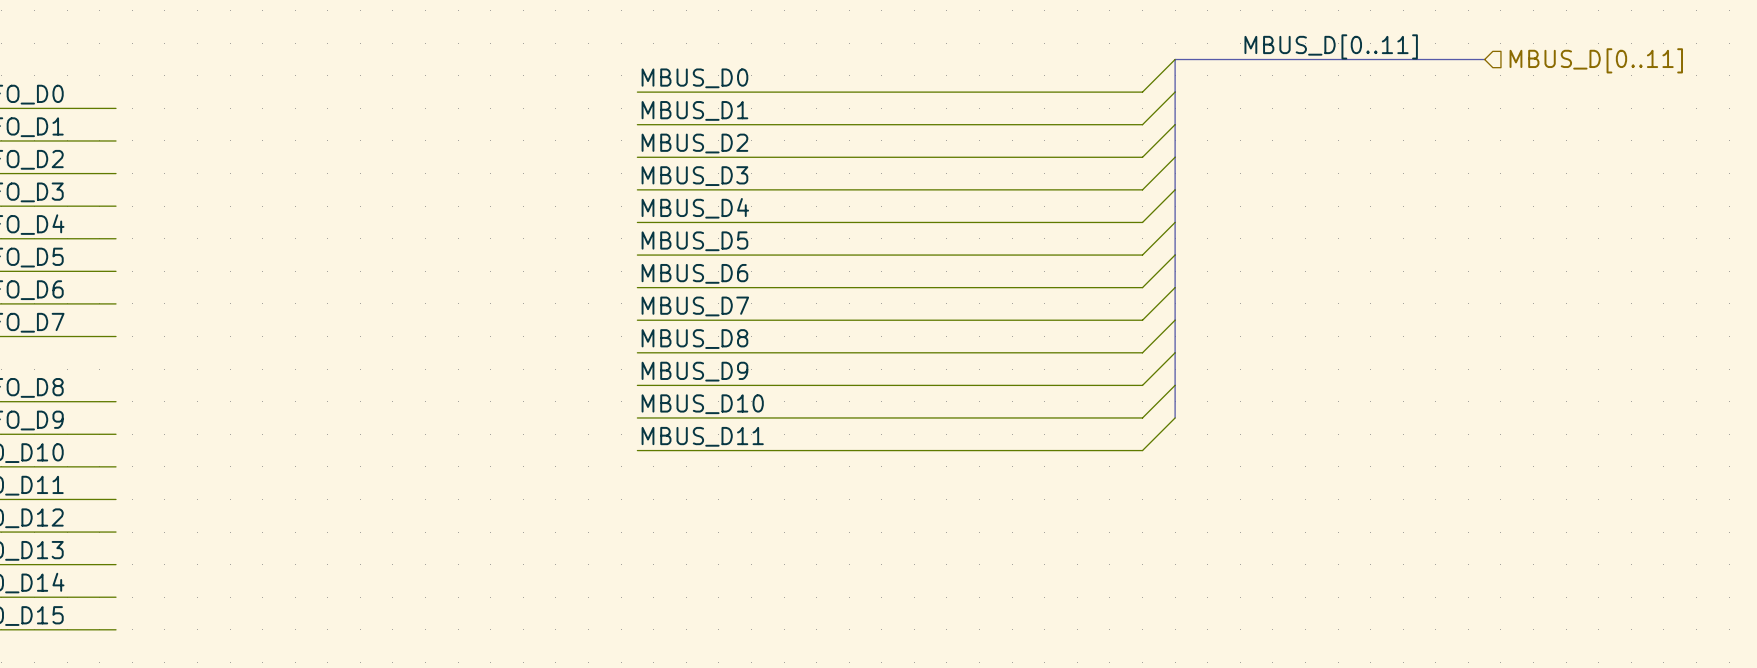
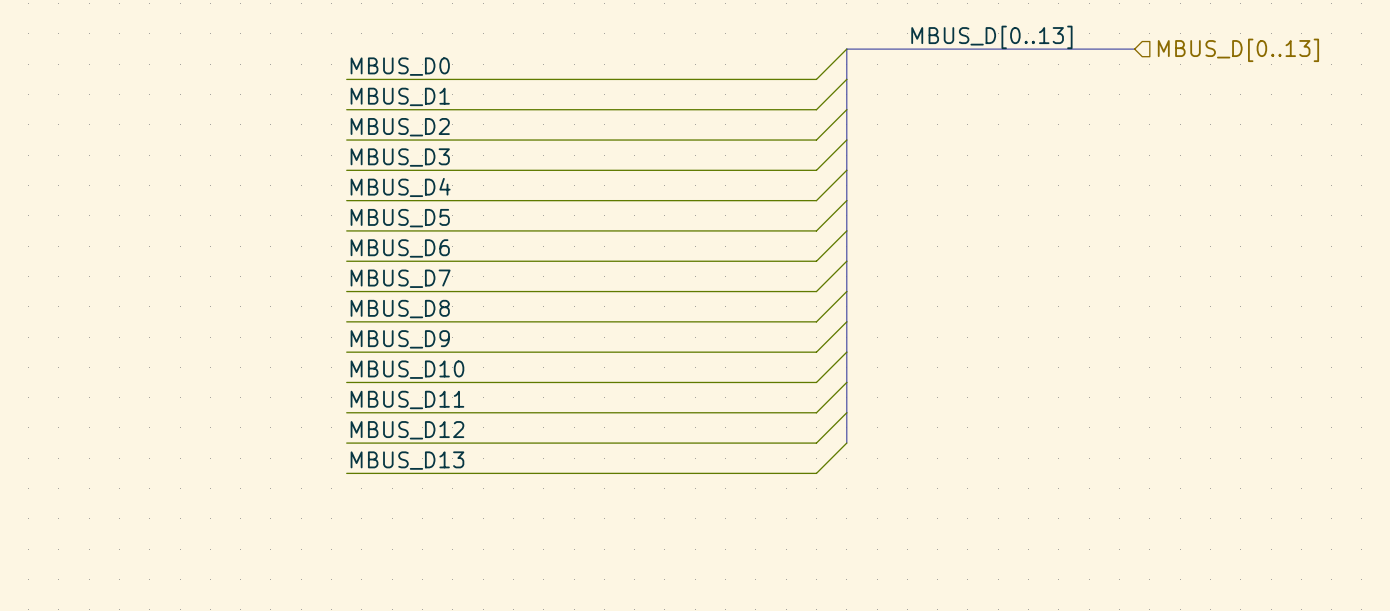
label: MBUS_D[0..11] (1331, 46) -> MBUS_D[0..13] (991, 37)
hierarchical label: MBUS_D[0..11] (1596, 60) -> MBUS_D[0..13] (1238, 50)
bus: none -> (846, 382) (846, 443)
wire: none -> (846, 412) (816, 443) (346, 443)
label: none -> MBUS_D12 (407, 430)
wire: none -> (846, 443) (816, 473) (346, 473)
label: none -> MBUS_D13 (407, 460)

